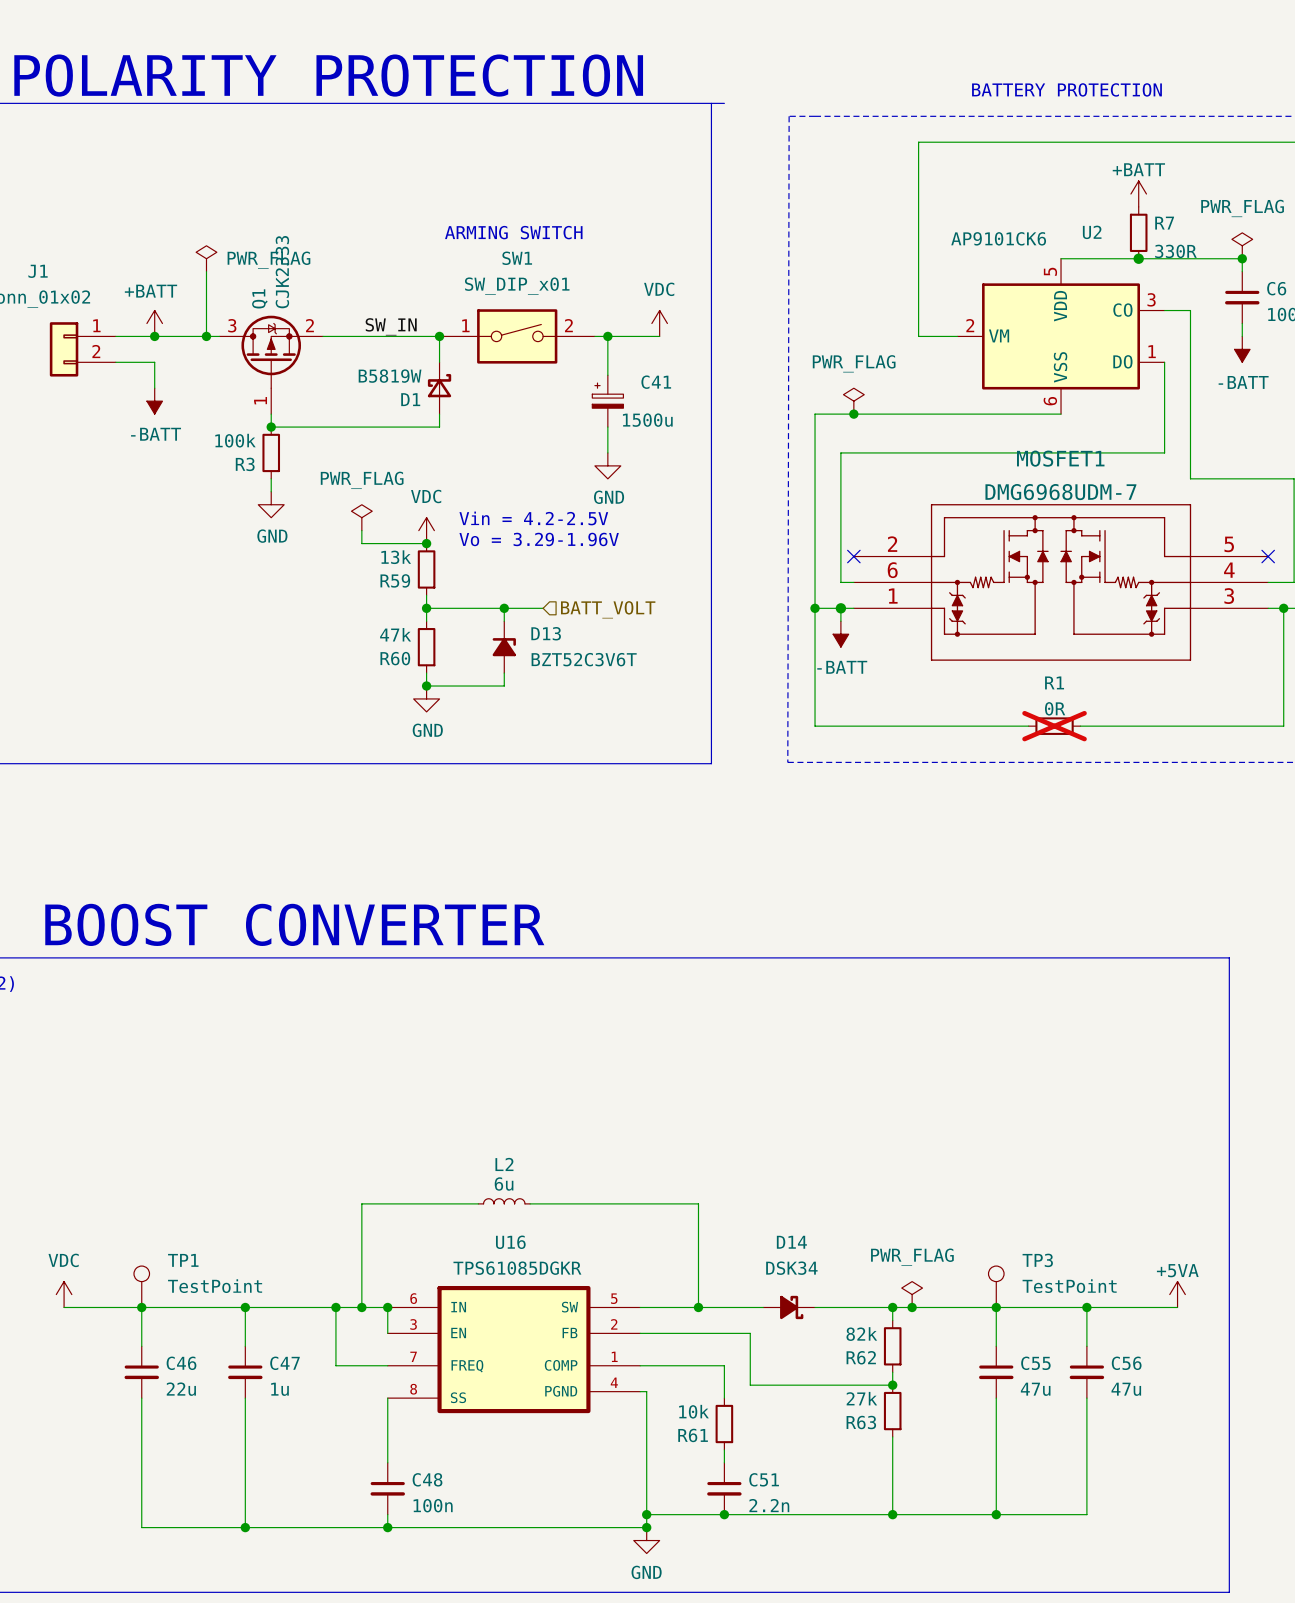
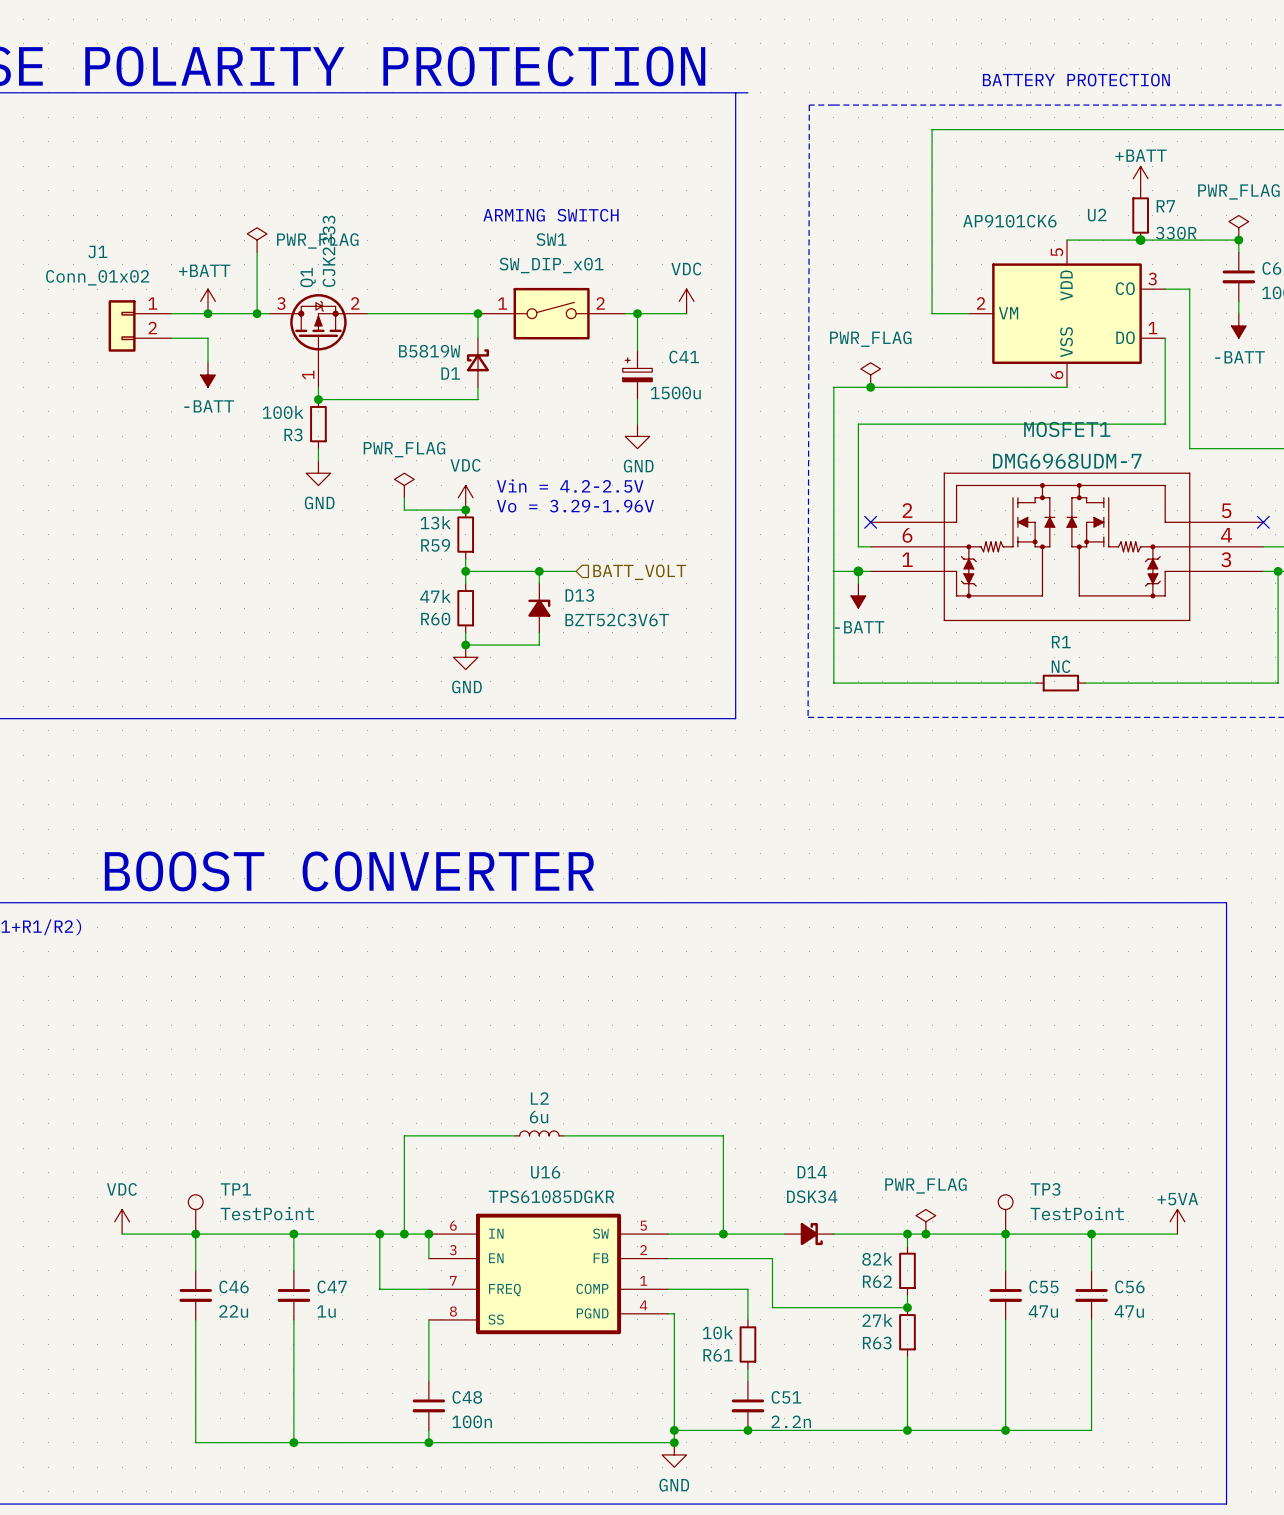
label: SW_IN (391, 326) -> none
junction: (815, 608) -> none
R1 value: 0R (1055, 708) -> NC (1061, 666)
R1 do-not-place cross: (1054, 726) -> none

